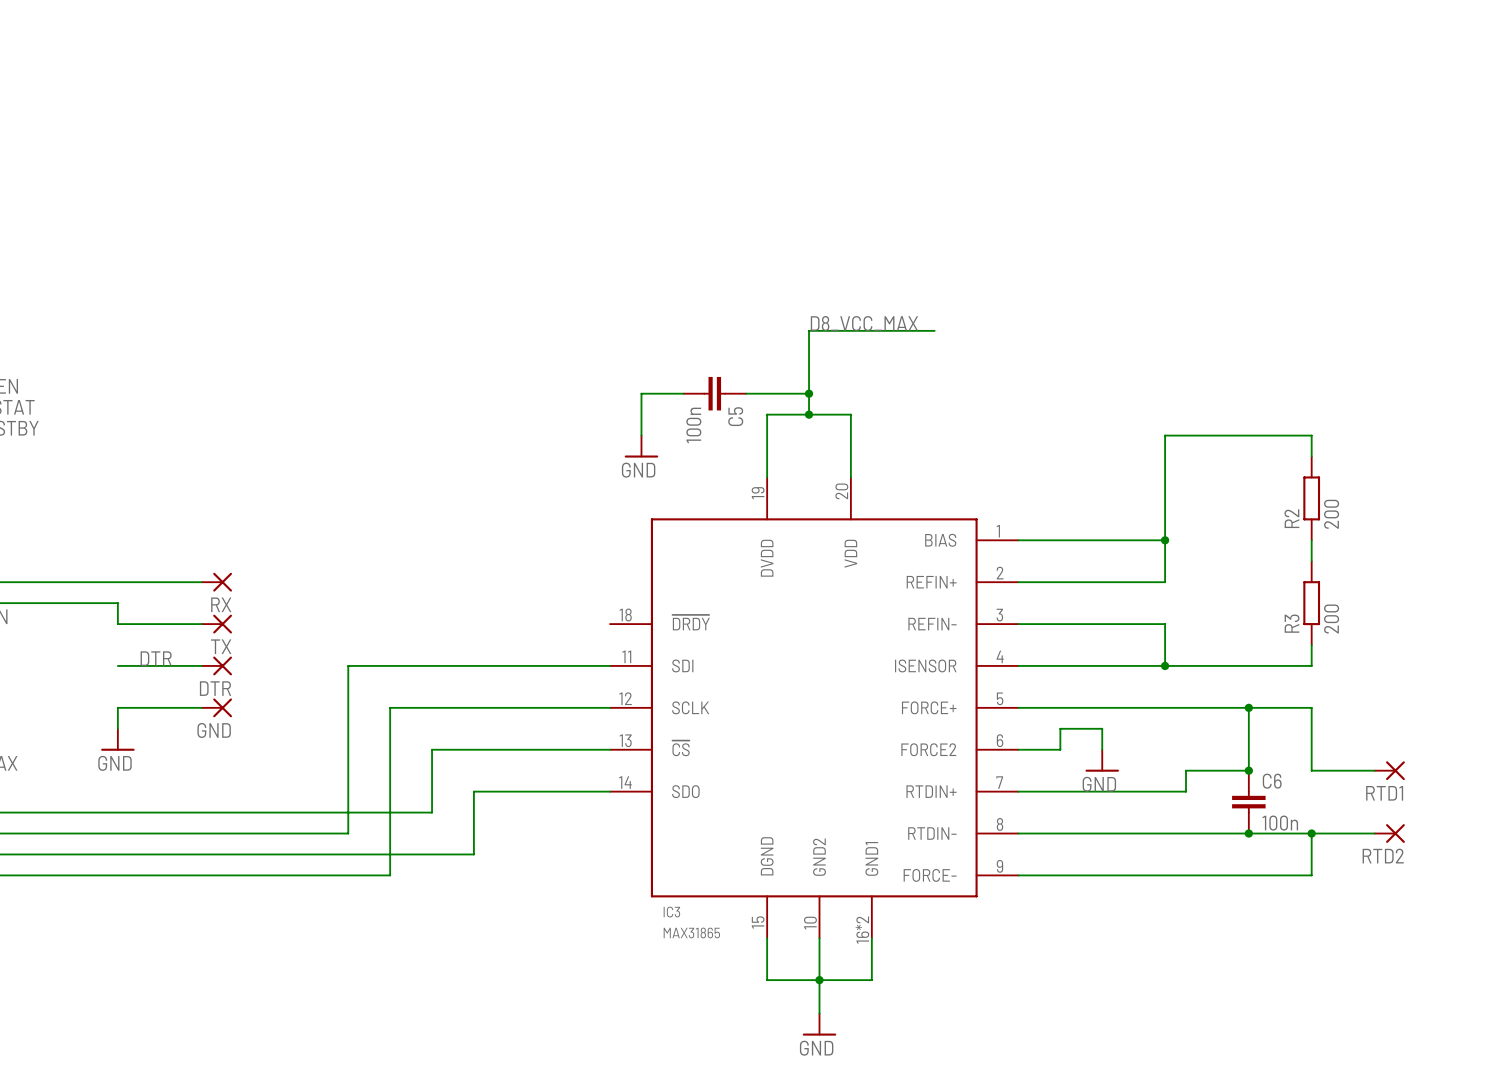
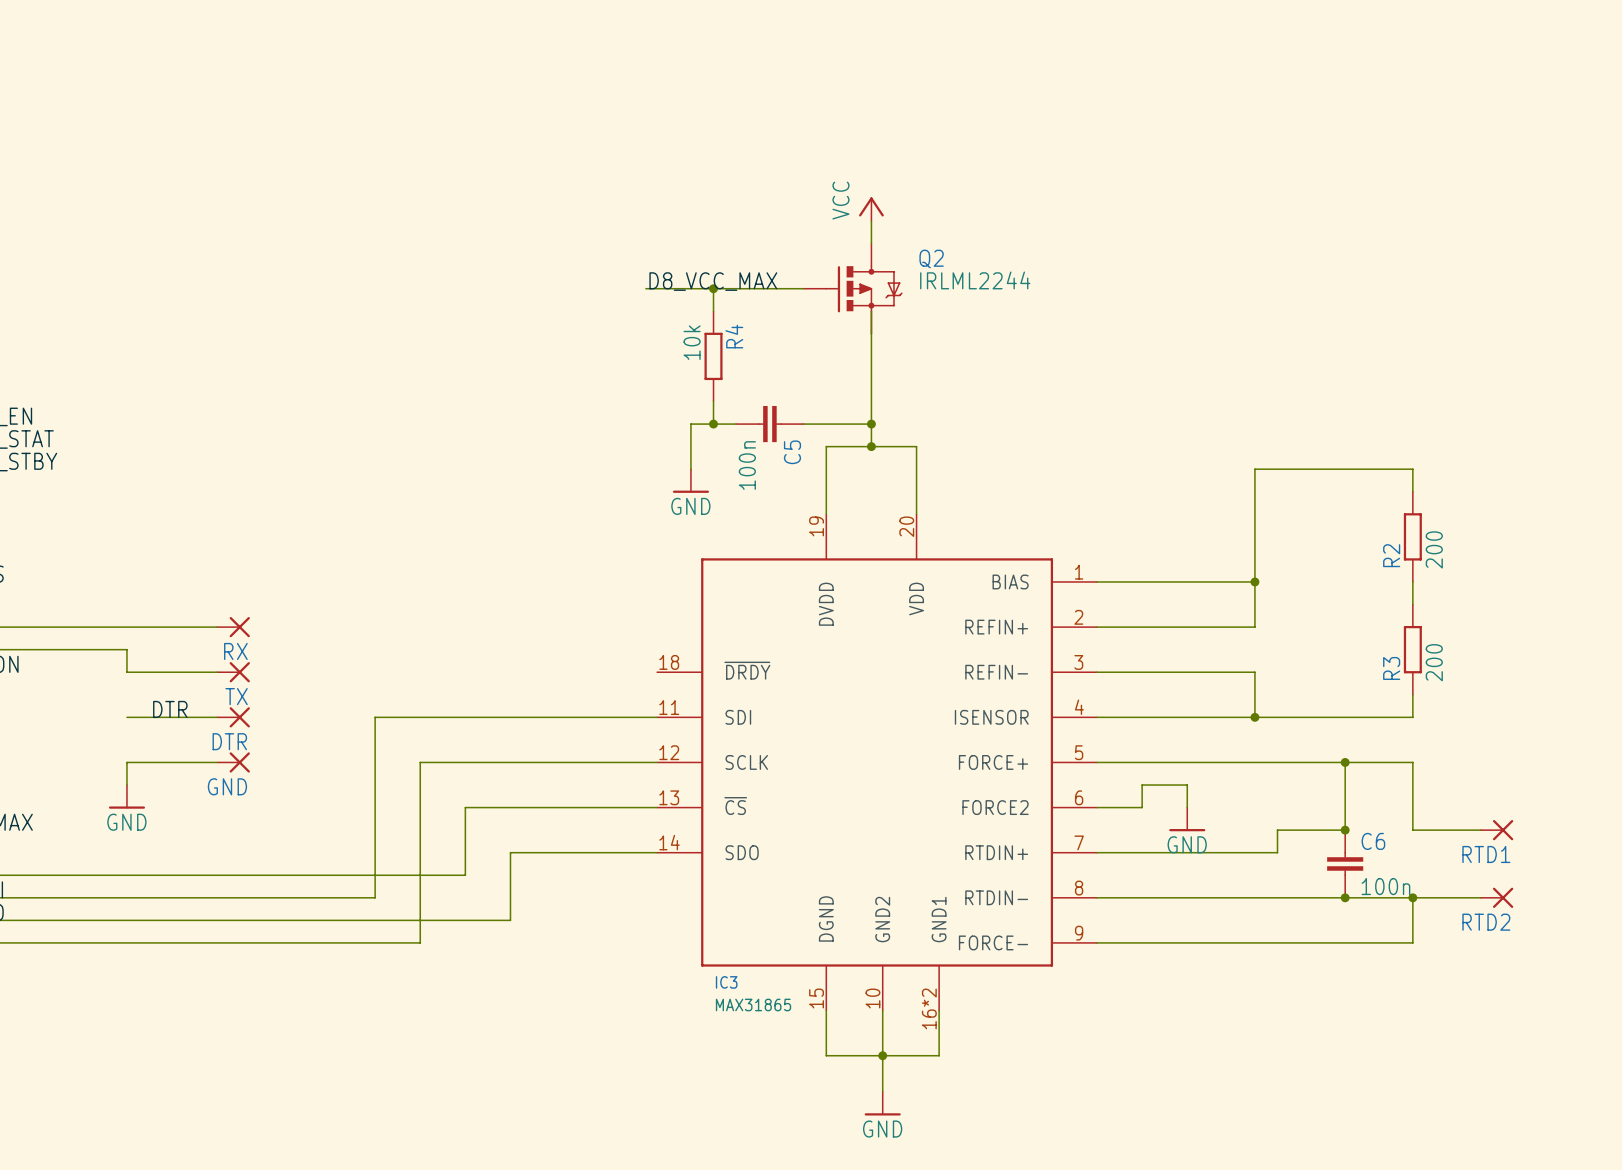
power symbol: none -> VCC (871, 209)
wire: none -> (871, 221) (871, 243)
label: none -> D8_VCC_MAX (713, 281)
wire: none -> (645, 288) (803, 288)
wire: none -> (713, 288) (713, 311)
junction: none -> (713, 288)
Q2: none -> IRLML2244 (853, 288)
label: D8_VCC_MAX (864, 323) -> none
R4: none -> 10k (713, 356)
wire: (809, 330) (934, 330) -> (871, 356) (871, 311)
wire: none -> (713, 401) (713, 424)
junction: none -> (713, 424)

